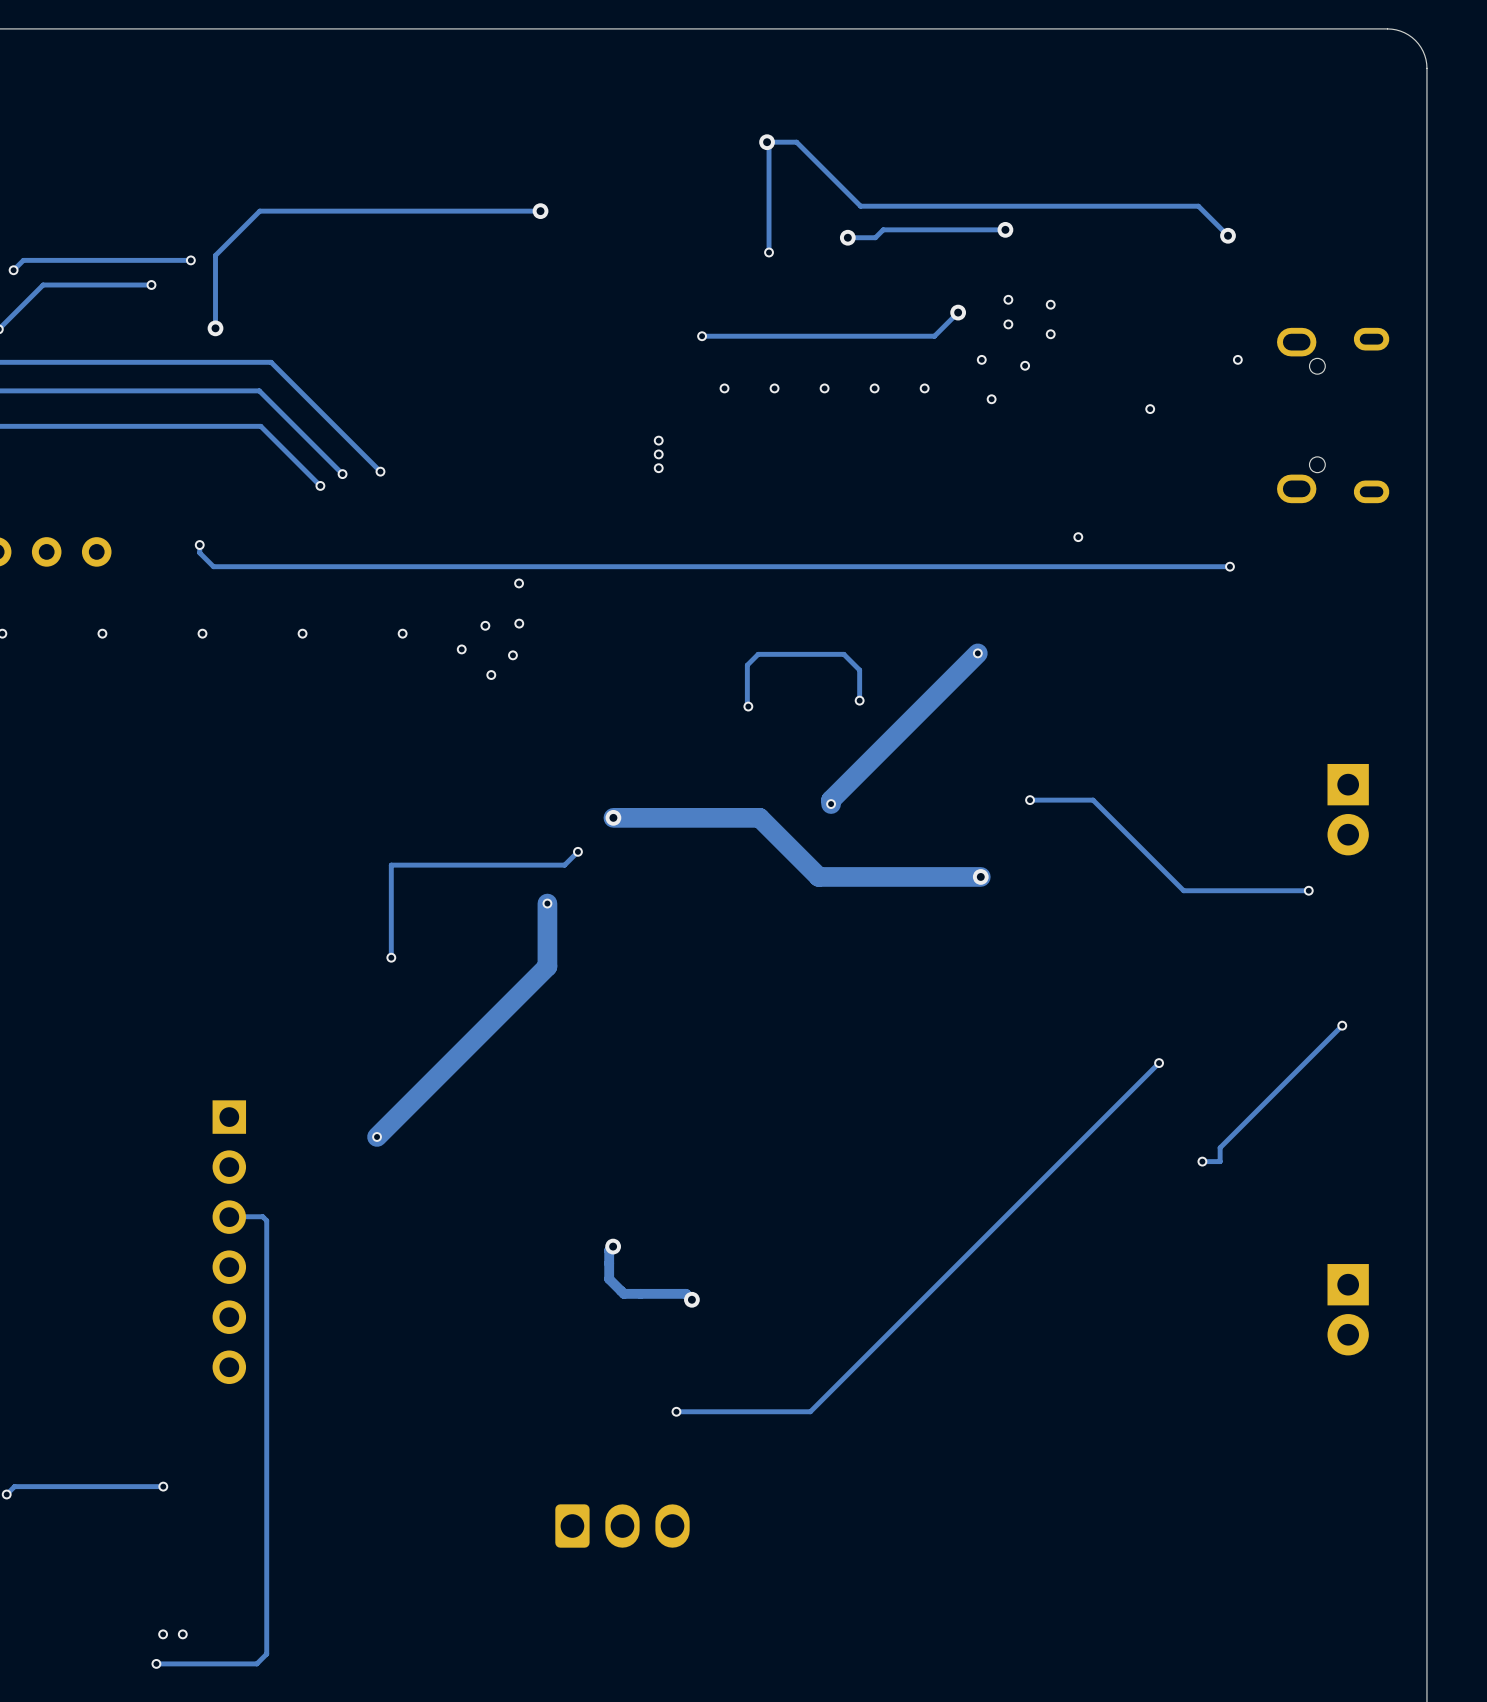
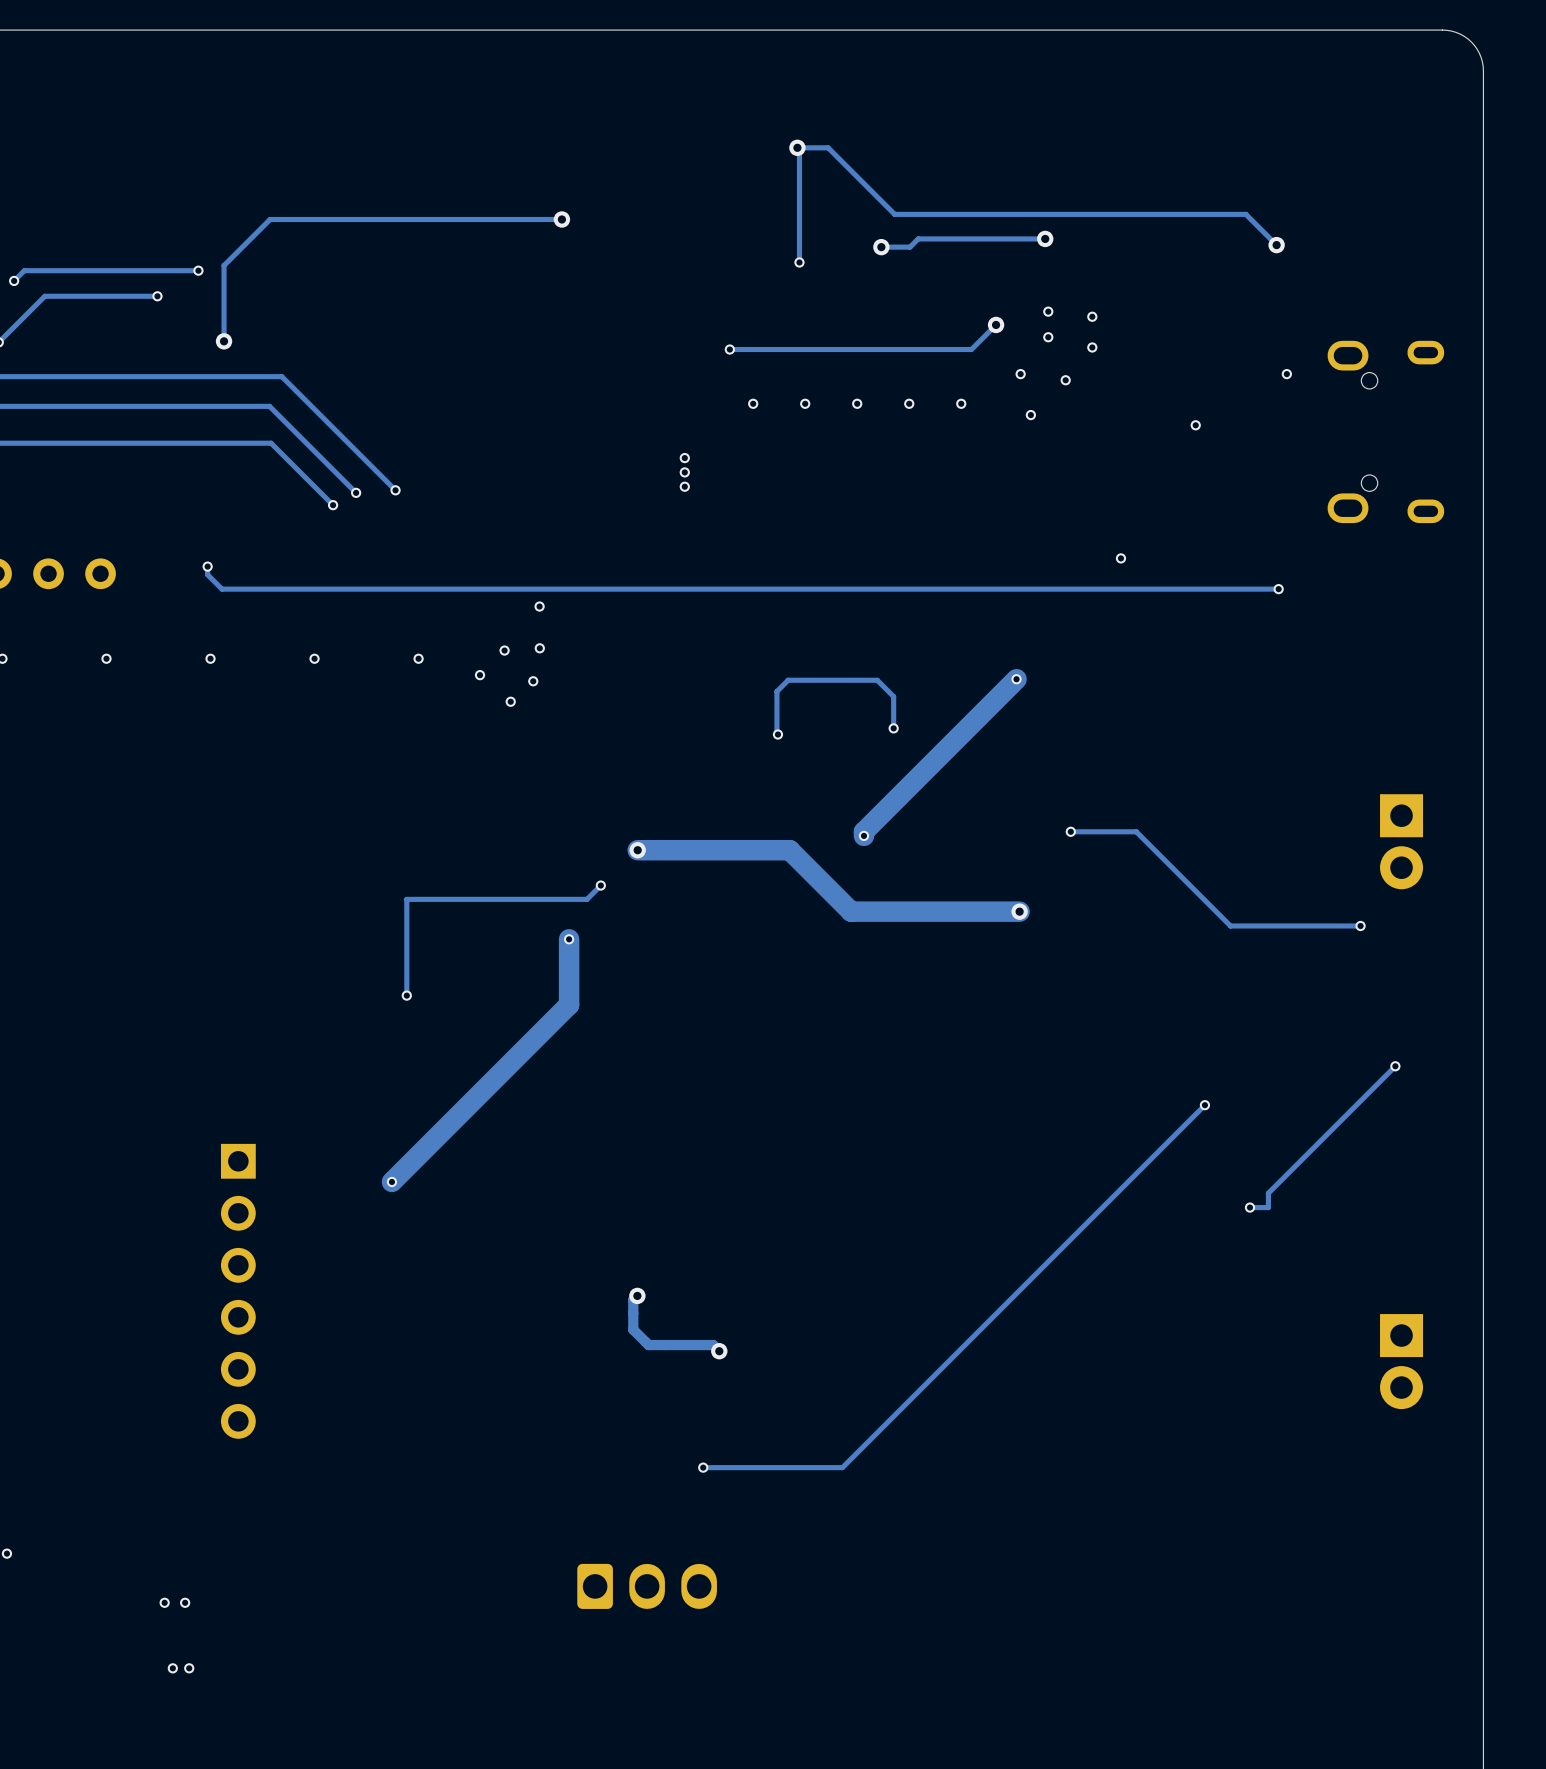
track: (229, 1217) (262, 1216) (266, 1220) (266, 1654) (256, 1663) (156, 1663) -> none
track: (163, 1486) (14, 1486) (6, 1494) -> none
via: (163, 1486) -> none
via: none -> (164, 1602)
via: none -> (185, 1602)
via: none -> (172, 1668)
via: none -> (189, 1668)
via: (163, 1634) -> none
via: (182, 1634) -> none
via: (156, 1663) -> none

